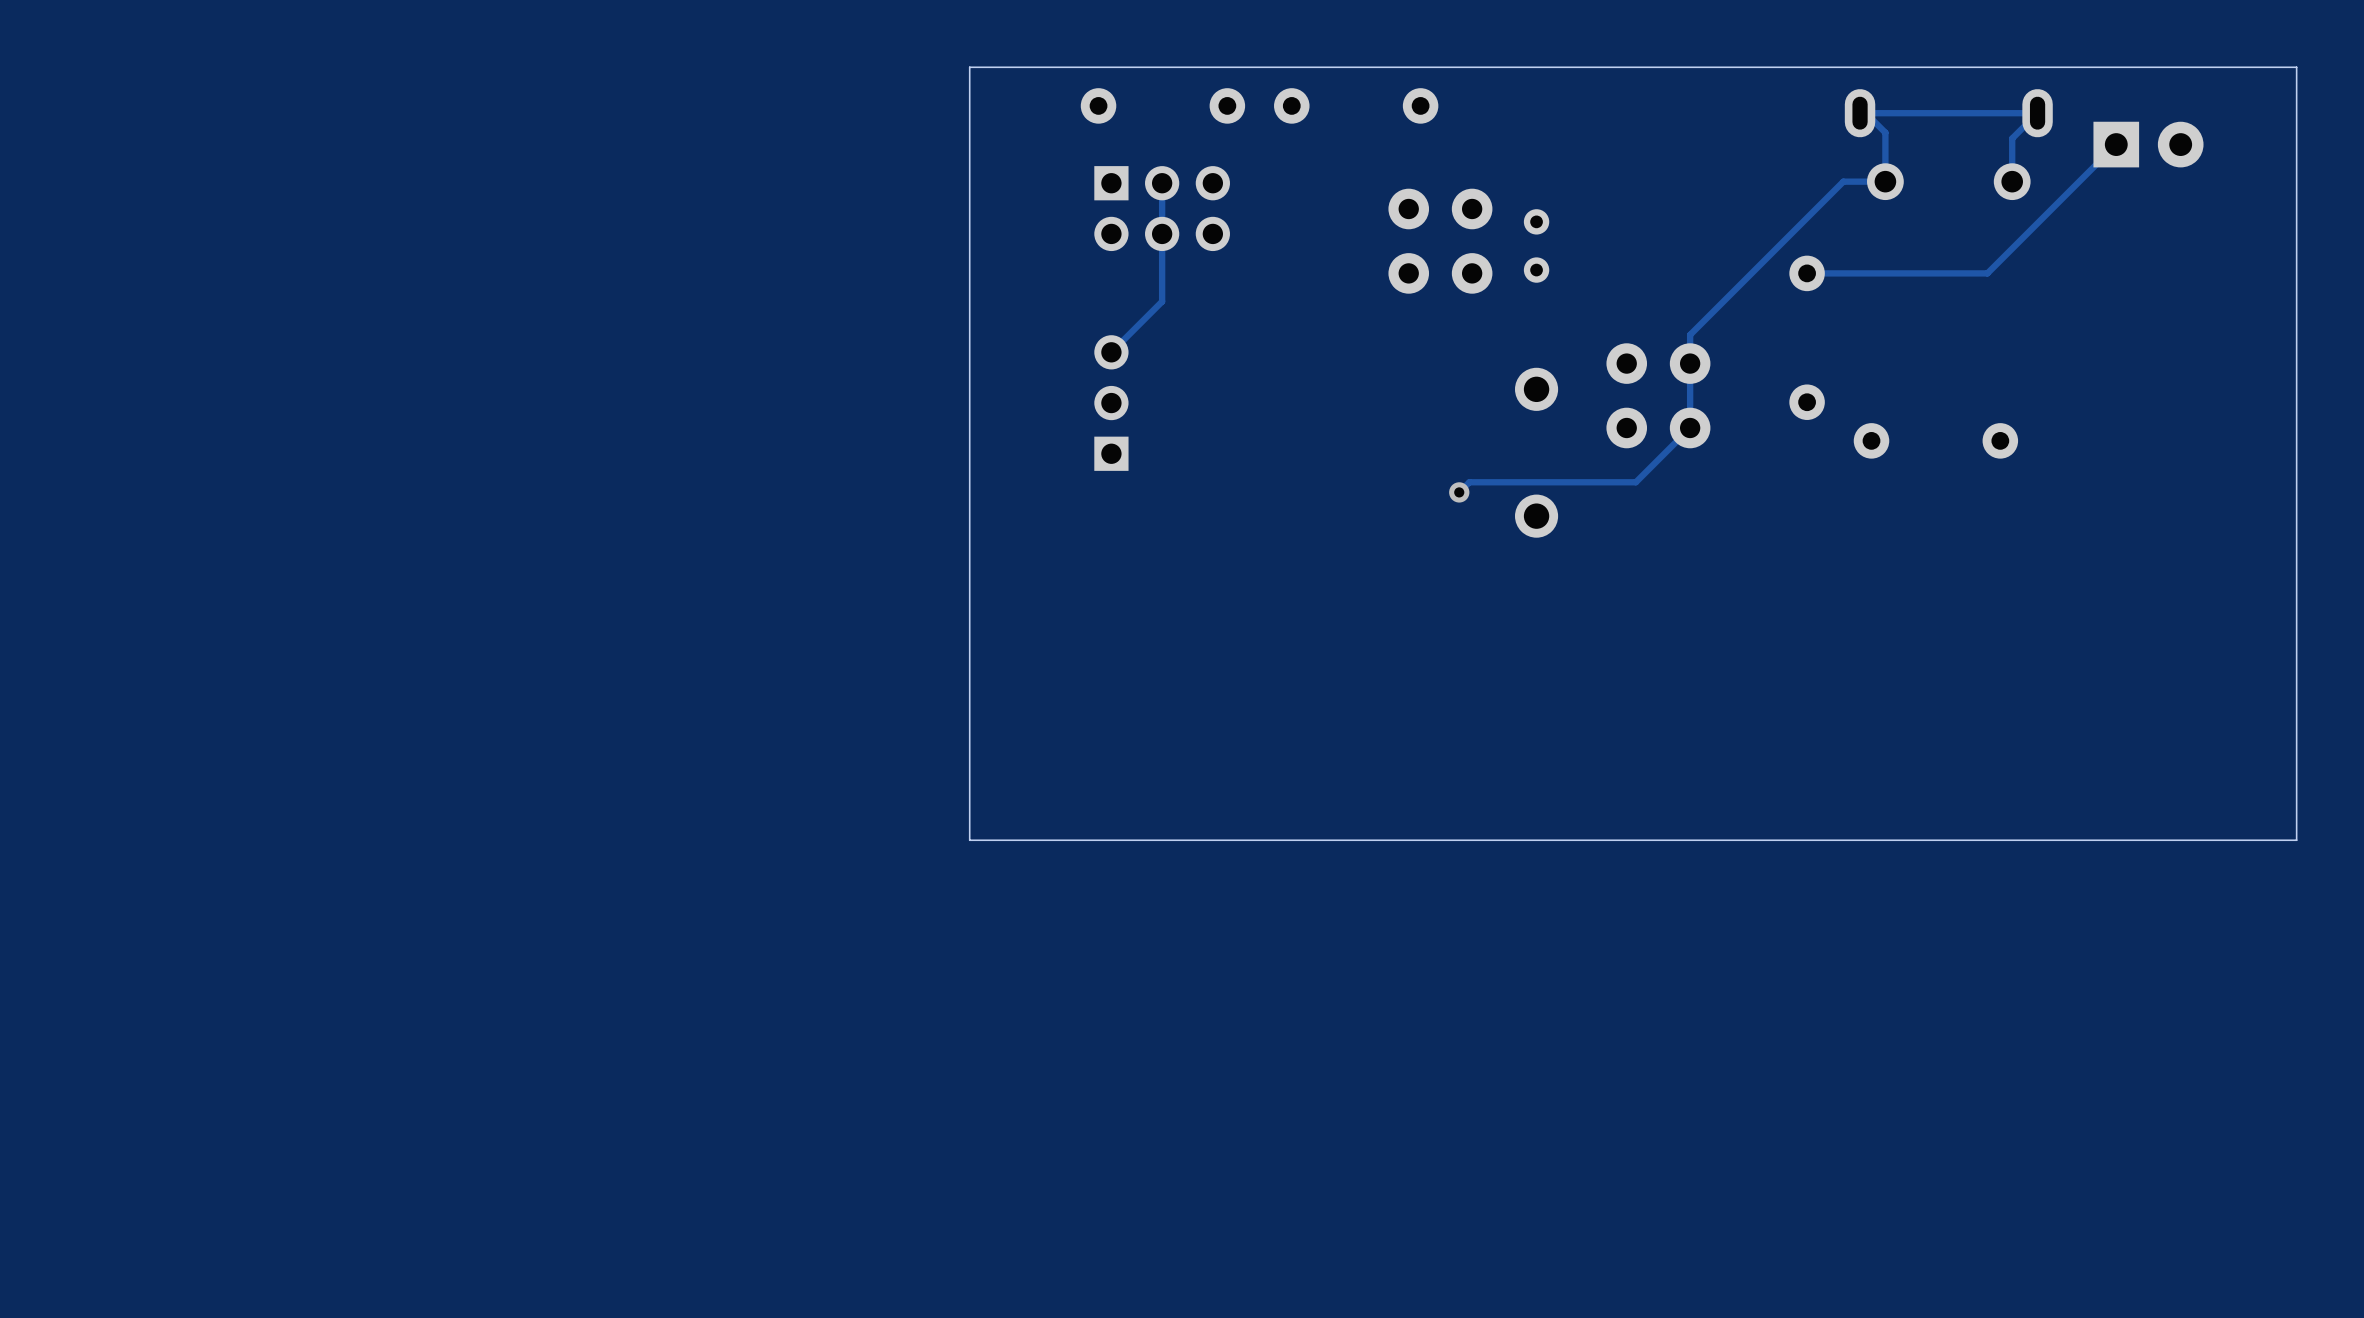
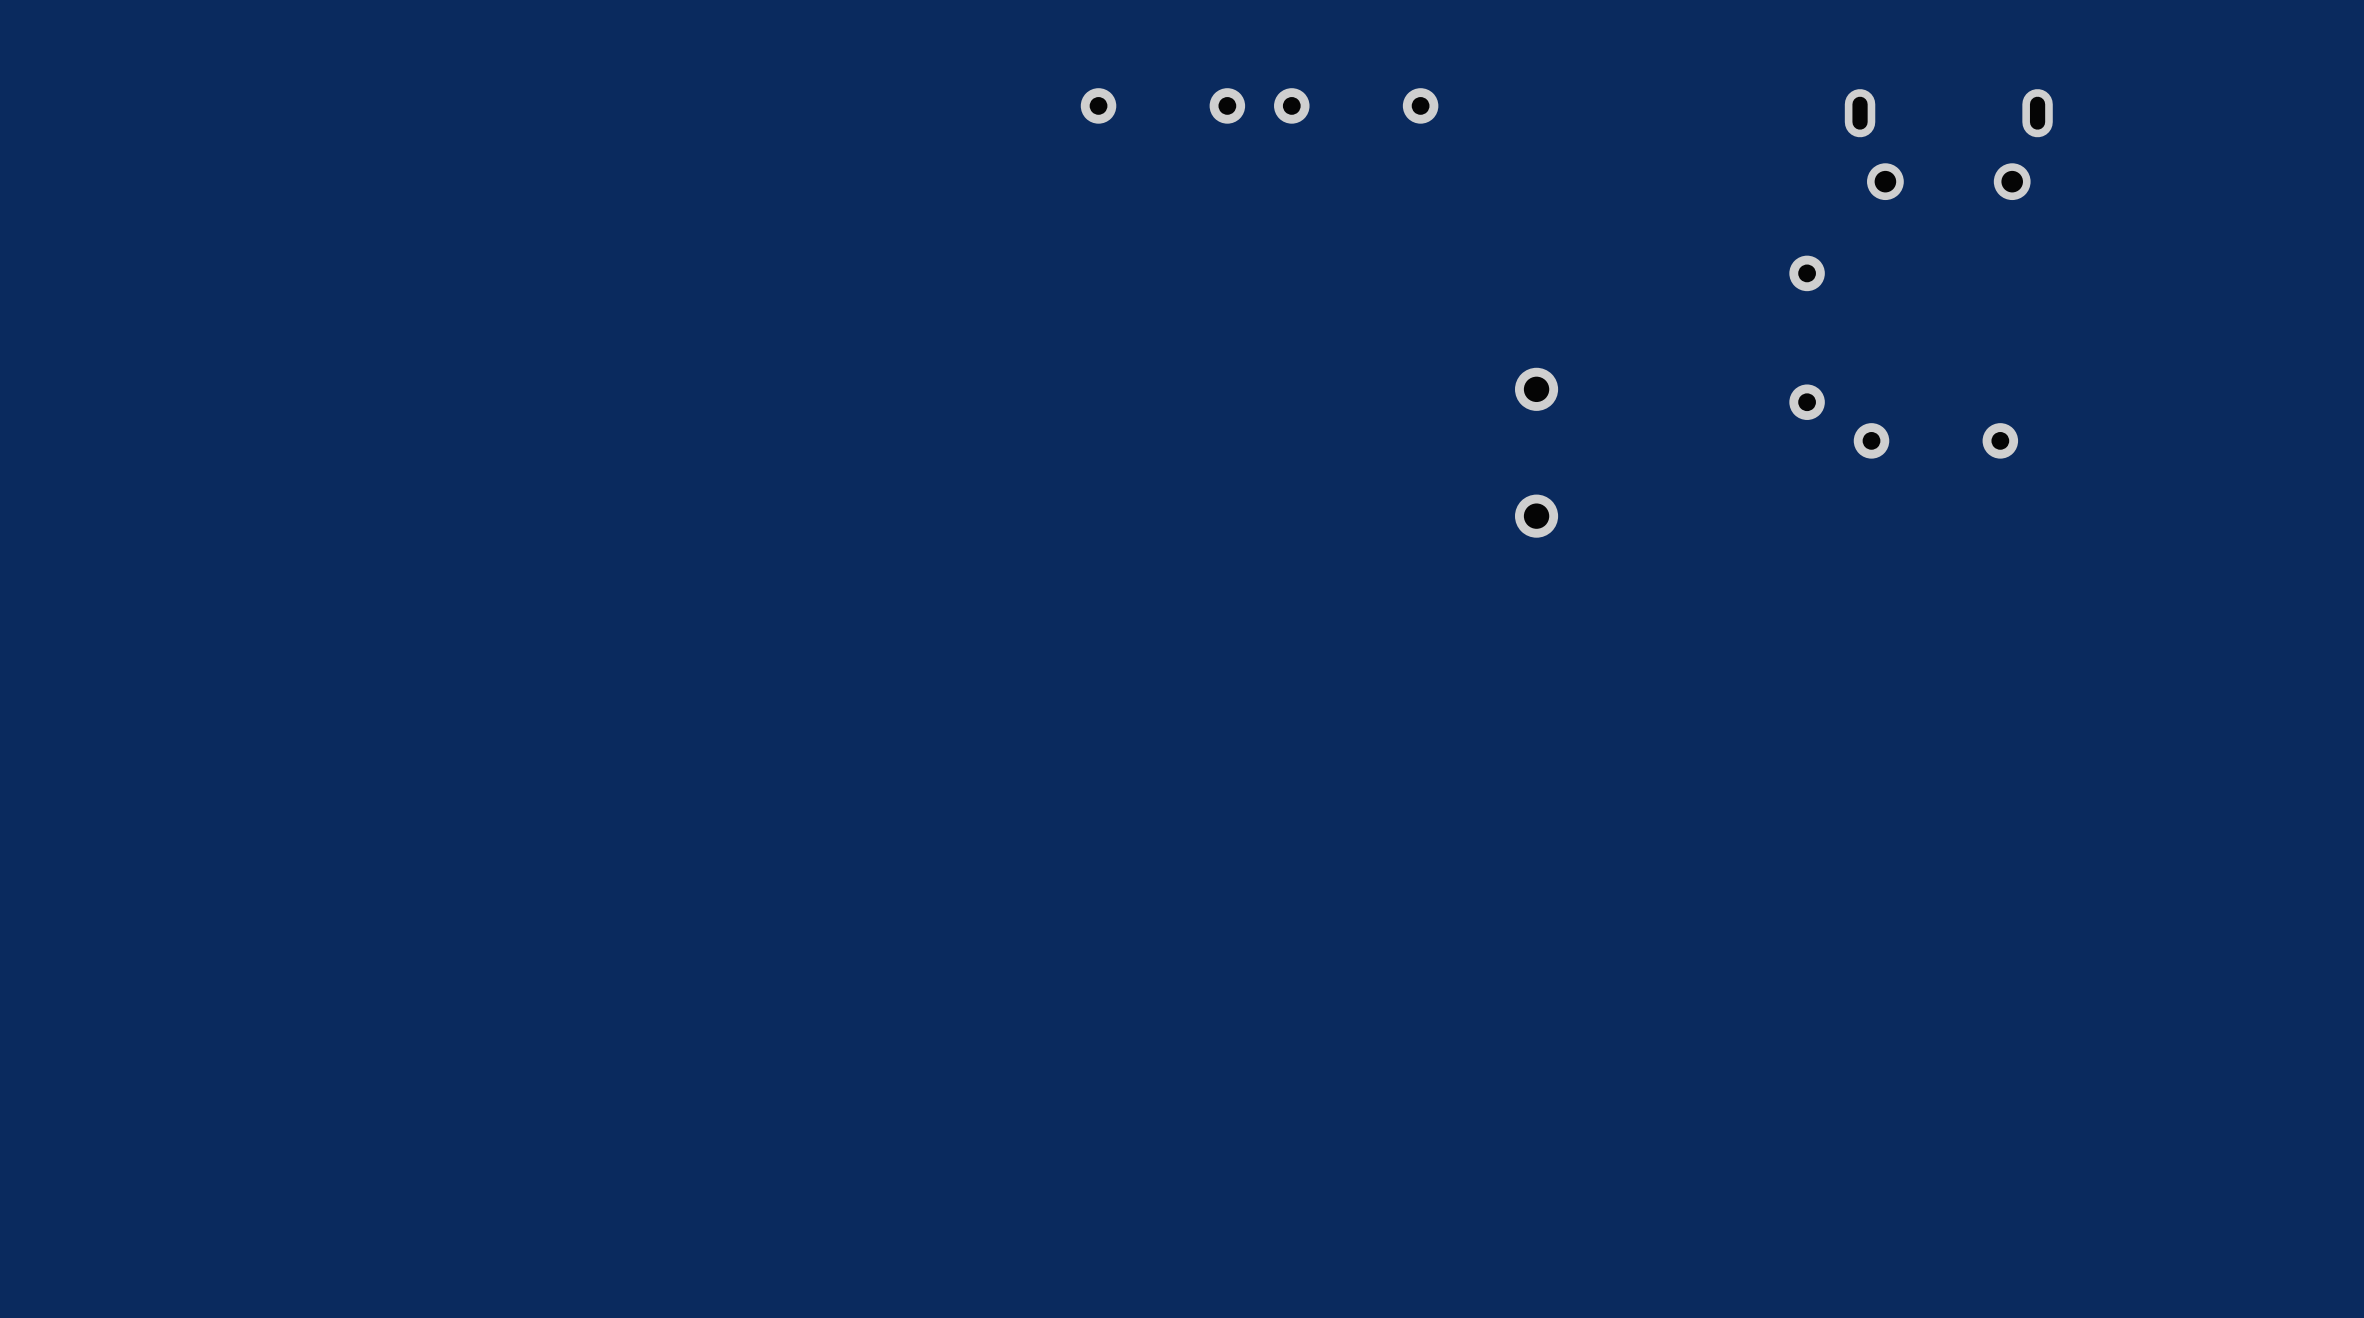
board edge: (2296, 67) (969, 67) (969, 840) (2296, 840) (2296, 67) -> none
track: (1860, 113) (2037, 113) (2012, 138) (2012, 181) -> none
track: (1865, 113) (1885, 132) (1885, 181) (1843, 181) (1690, 334) (1690, 427) (1635, 482) (1469, 482) (1459, 492) -> none
track: (2116, 144) (1987, 273) (1807, 273) -> none
part: (2148, 144) -> none
track: (1162, 183) (1162, 301) (1111, 352) -> none
part: (1162, 208) -> none
part: (1440, 208) -> none
part: (1536, 245) -> none
part: (1440, 273) -> none
part: (1658, 363) -> none
part: (1111, 403) -> none
part: (1658, 427) -> none
via: (1459, 492) -> none

